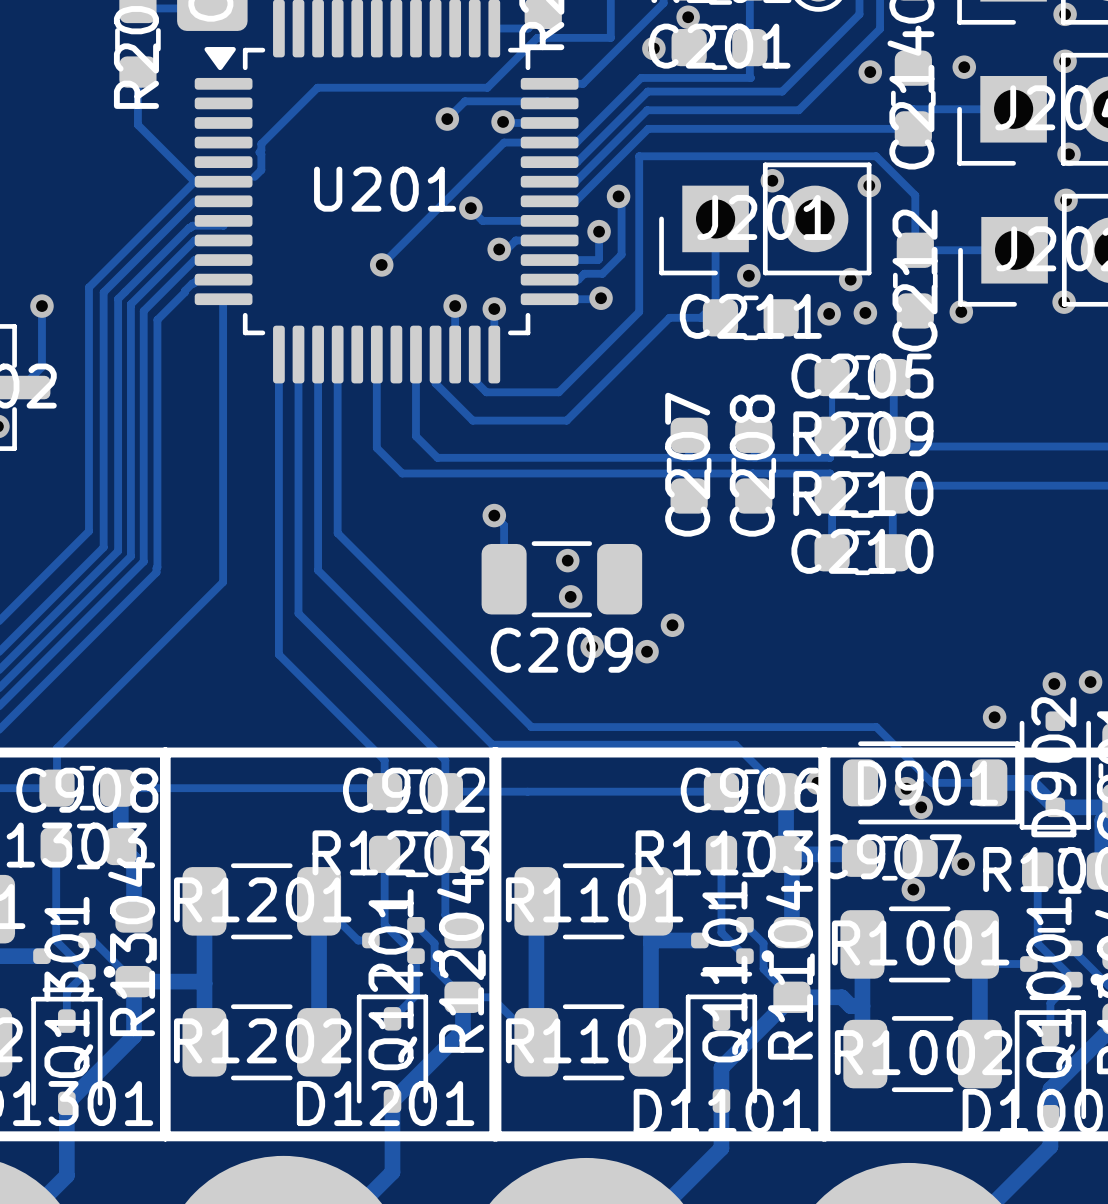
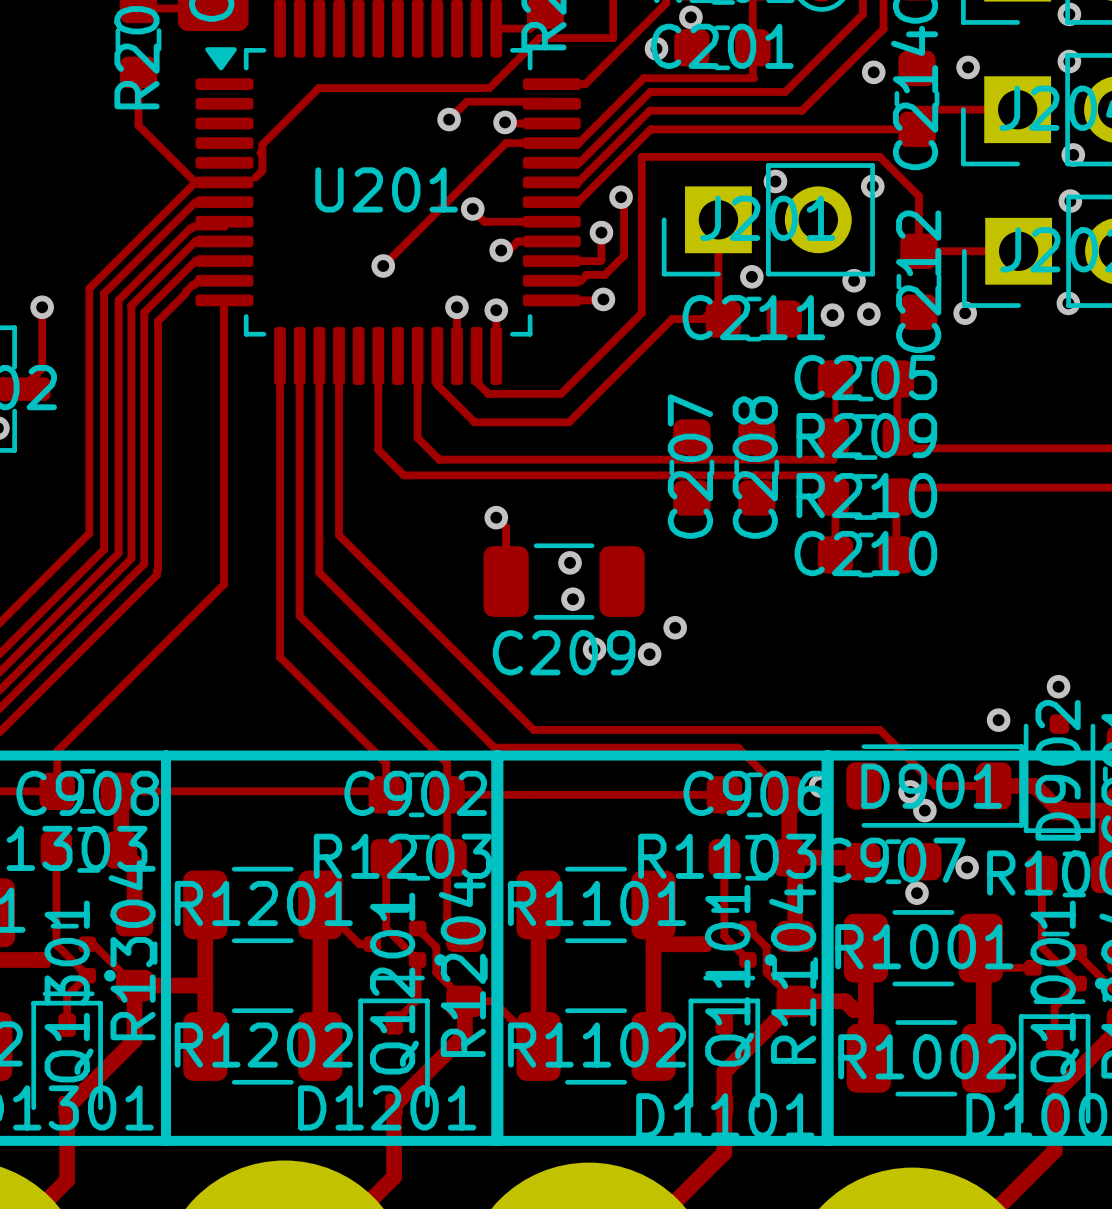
via: (1090, 682) -> none

